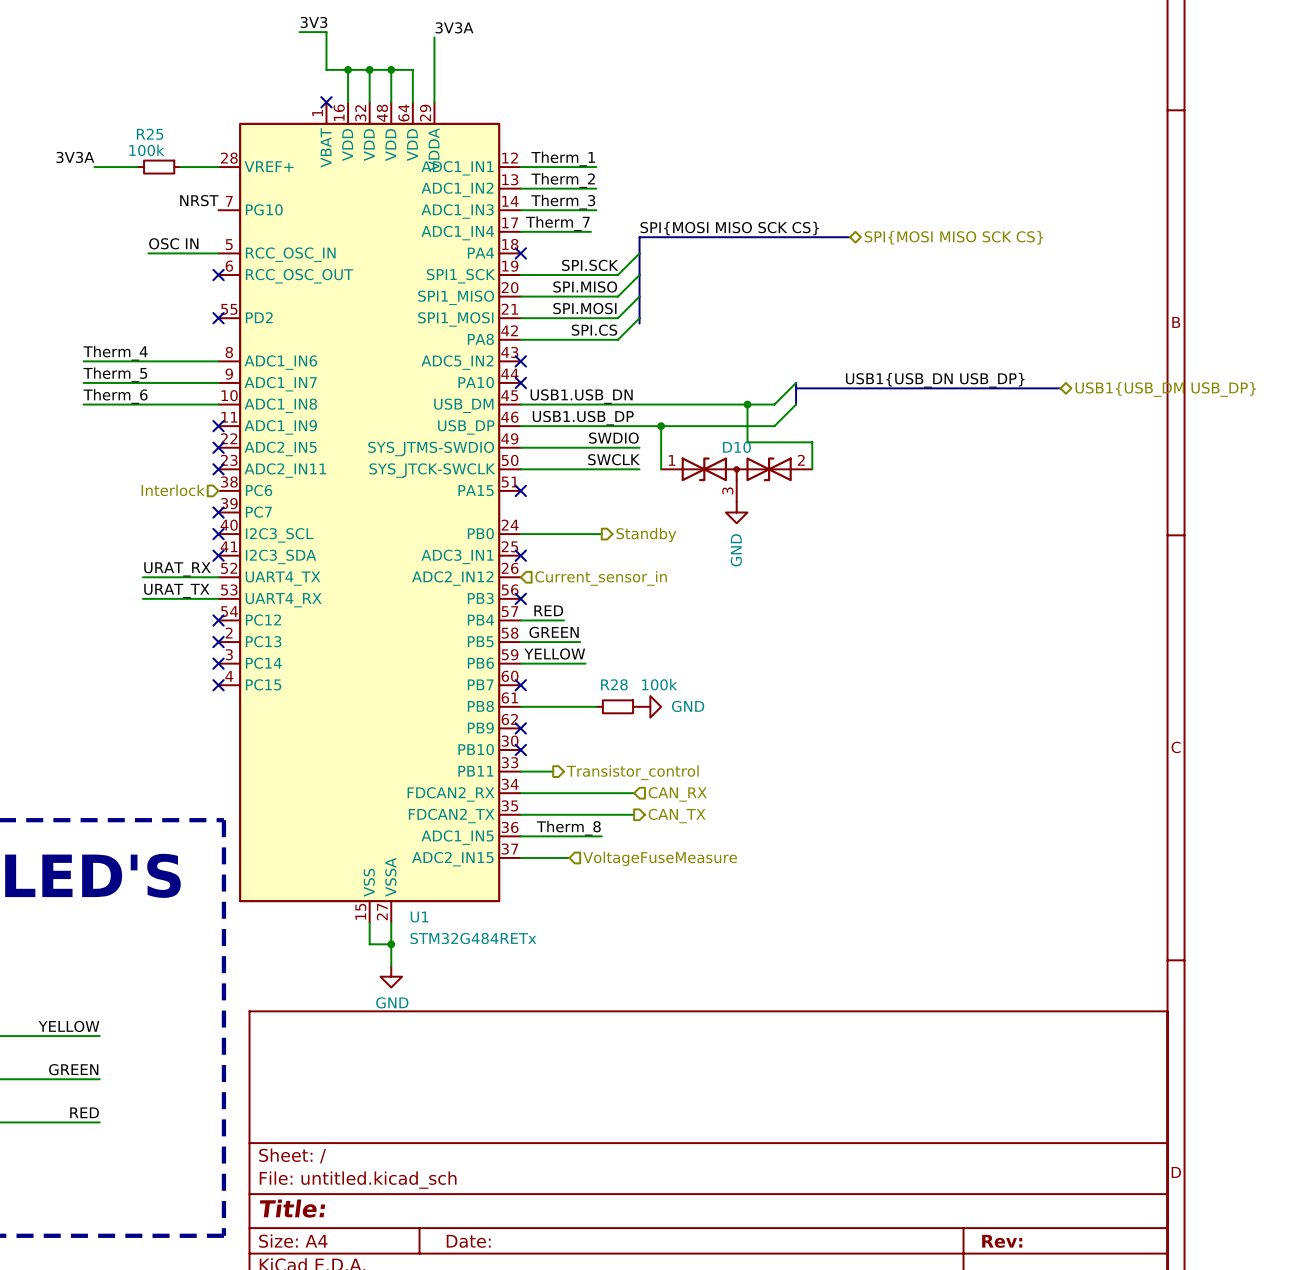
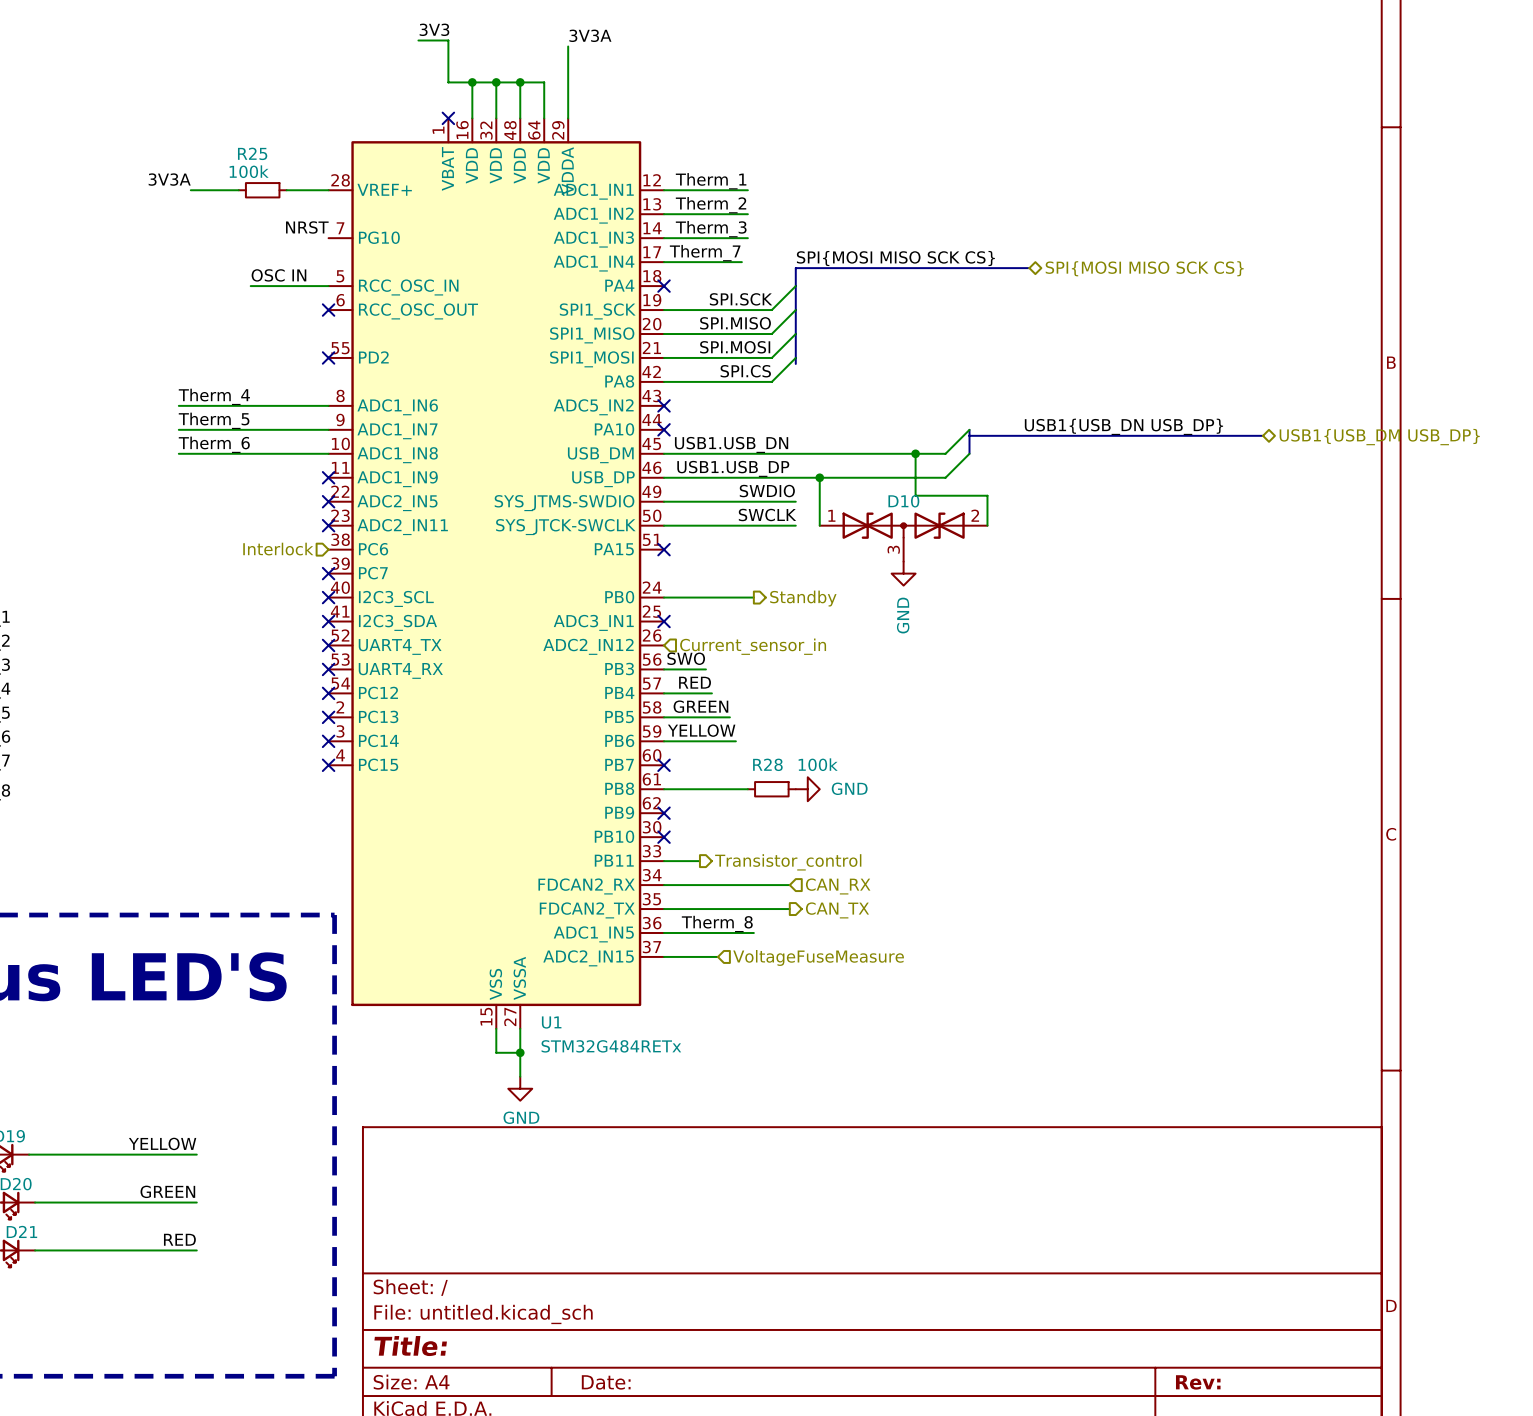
label: URAT_RX (177, 569) -> none
wire: (142, 577) (218, 577) -> none
no-connect mark: none -> (328, 645)
label: none -> SWO (686, 658)
label: URAT_TX (176, 590) -> none
wire: (142, 598) (218, 598) -> none
no-connect mark: none -> (328, 669)
wire: none -> (664, 669) (705, 669)
no-connect mark: (520, 598) -> none

